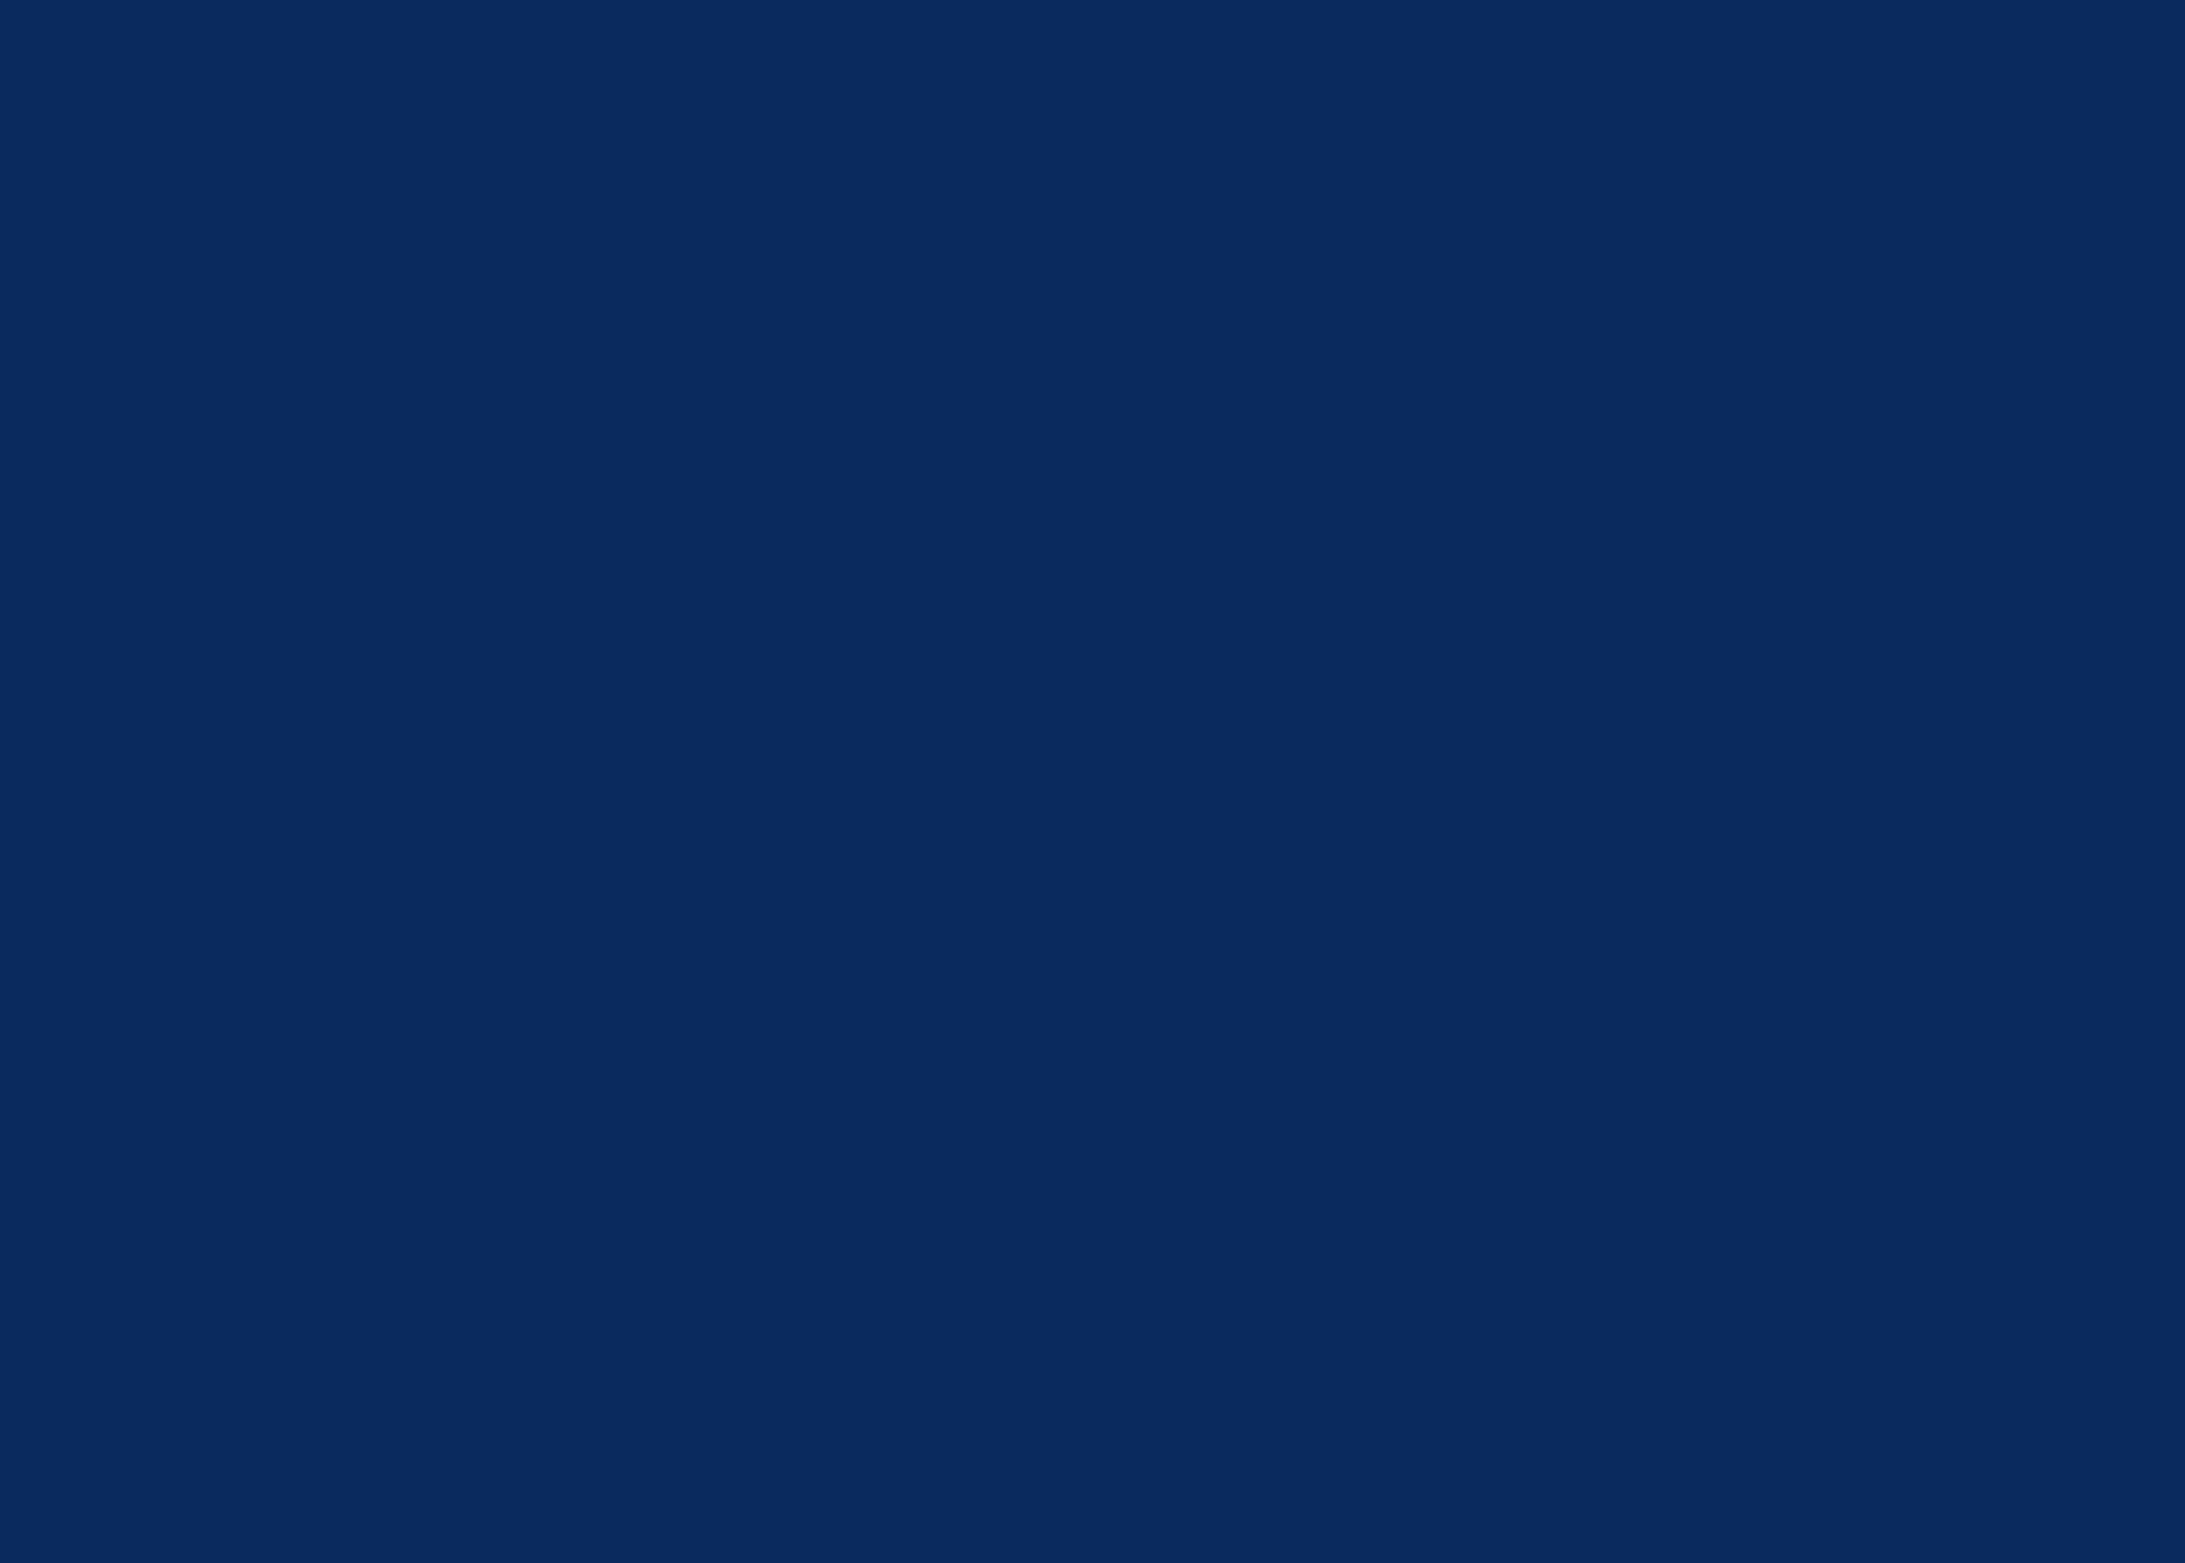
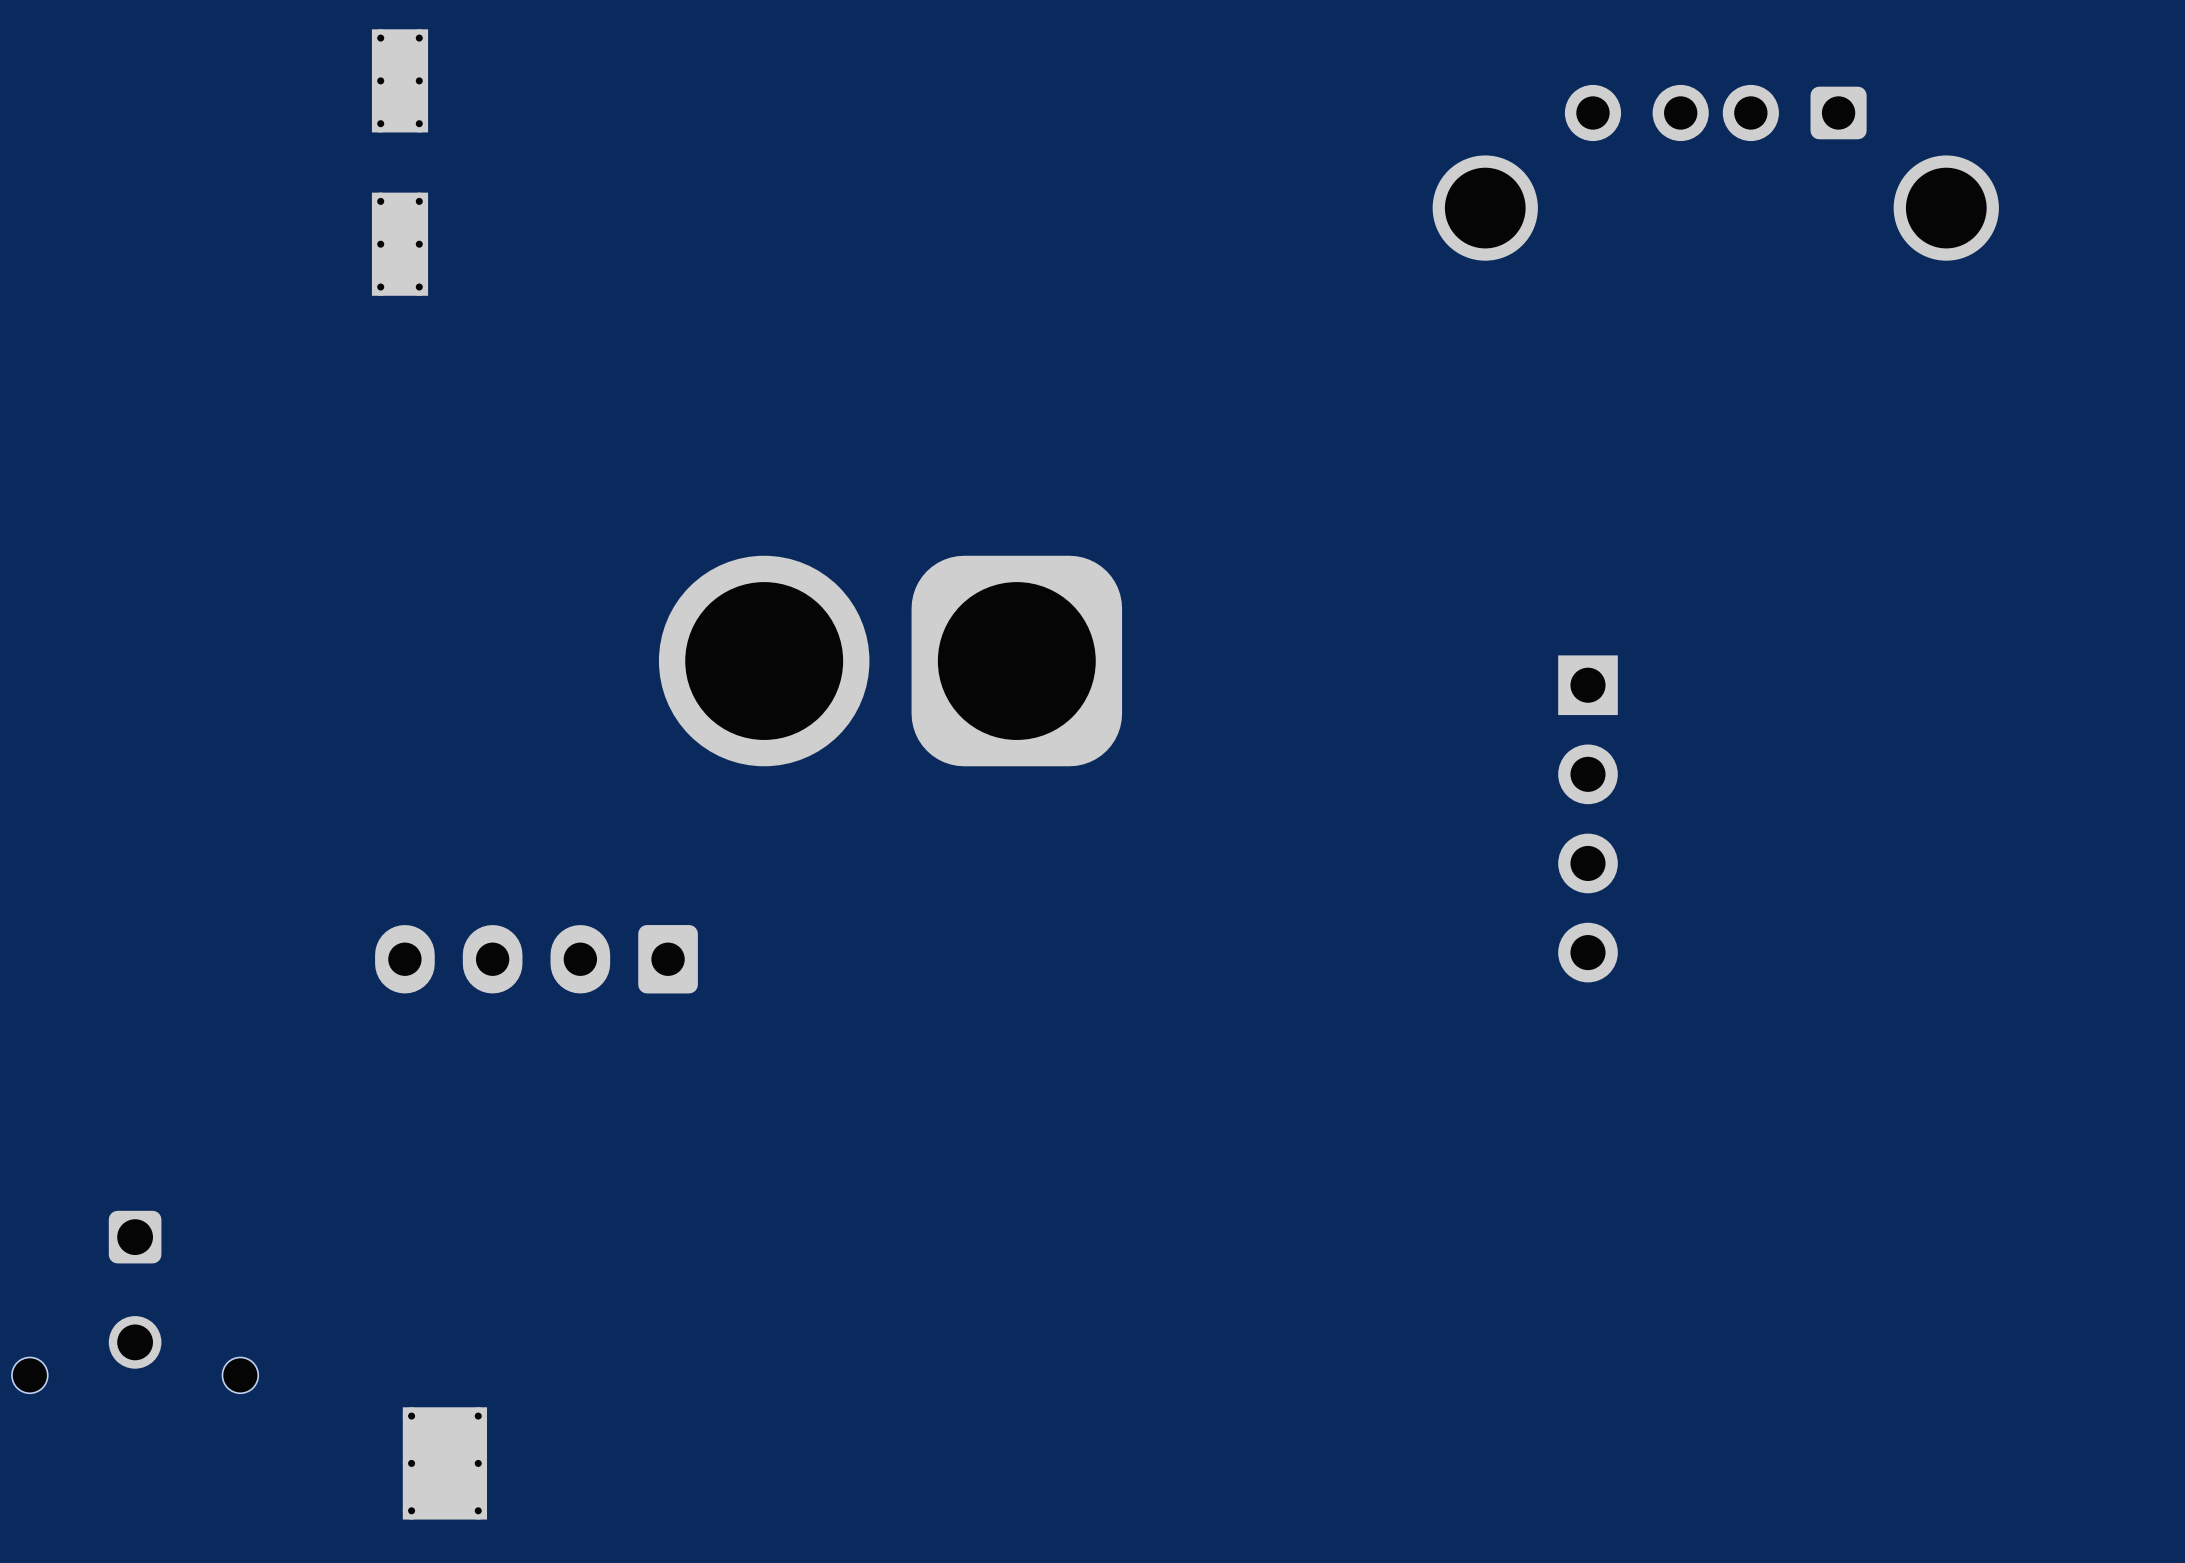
part: none -> (400, 80)
part: none -> (1715, 172)
part: none -> (400, 244)
part: none -> (890, 661)
part: none -> (1588, 818)
part: none -> (536, 959)
part: none -> (135, 1302)
part: none -> (444, 1463)

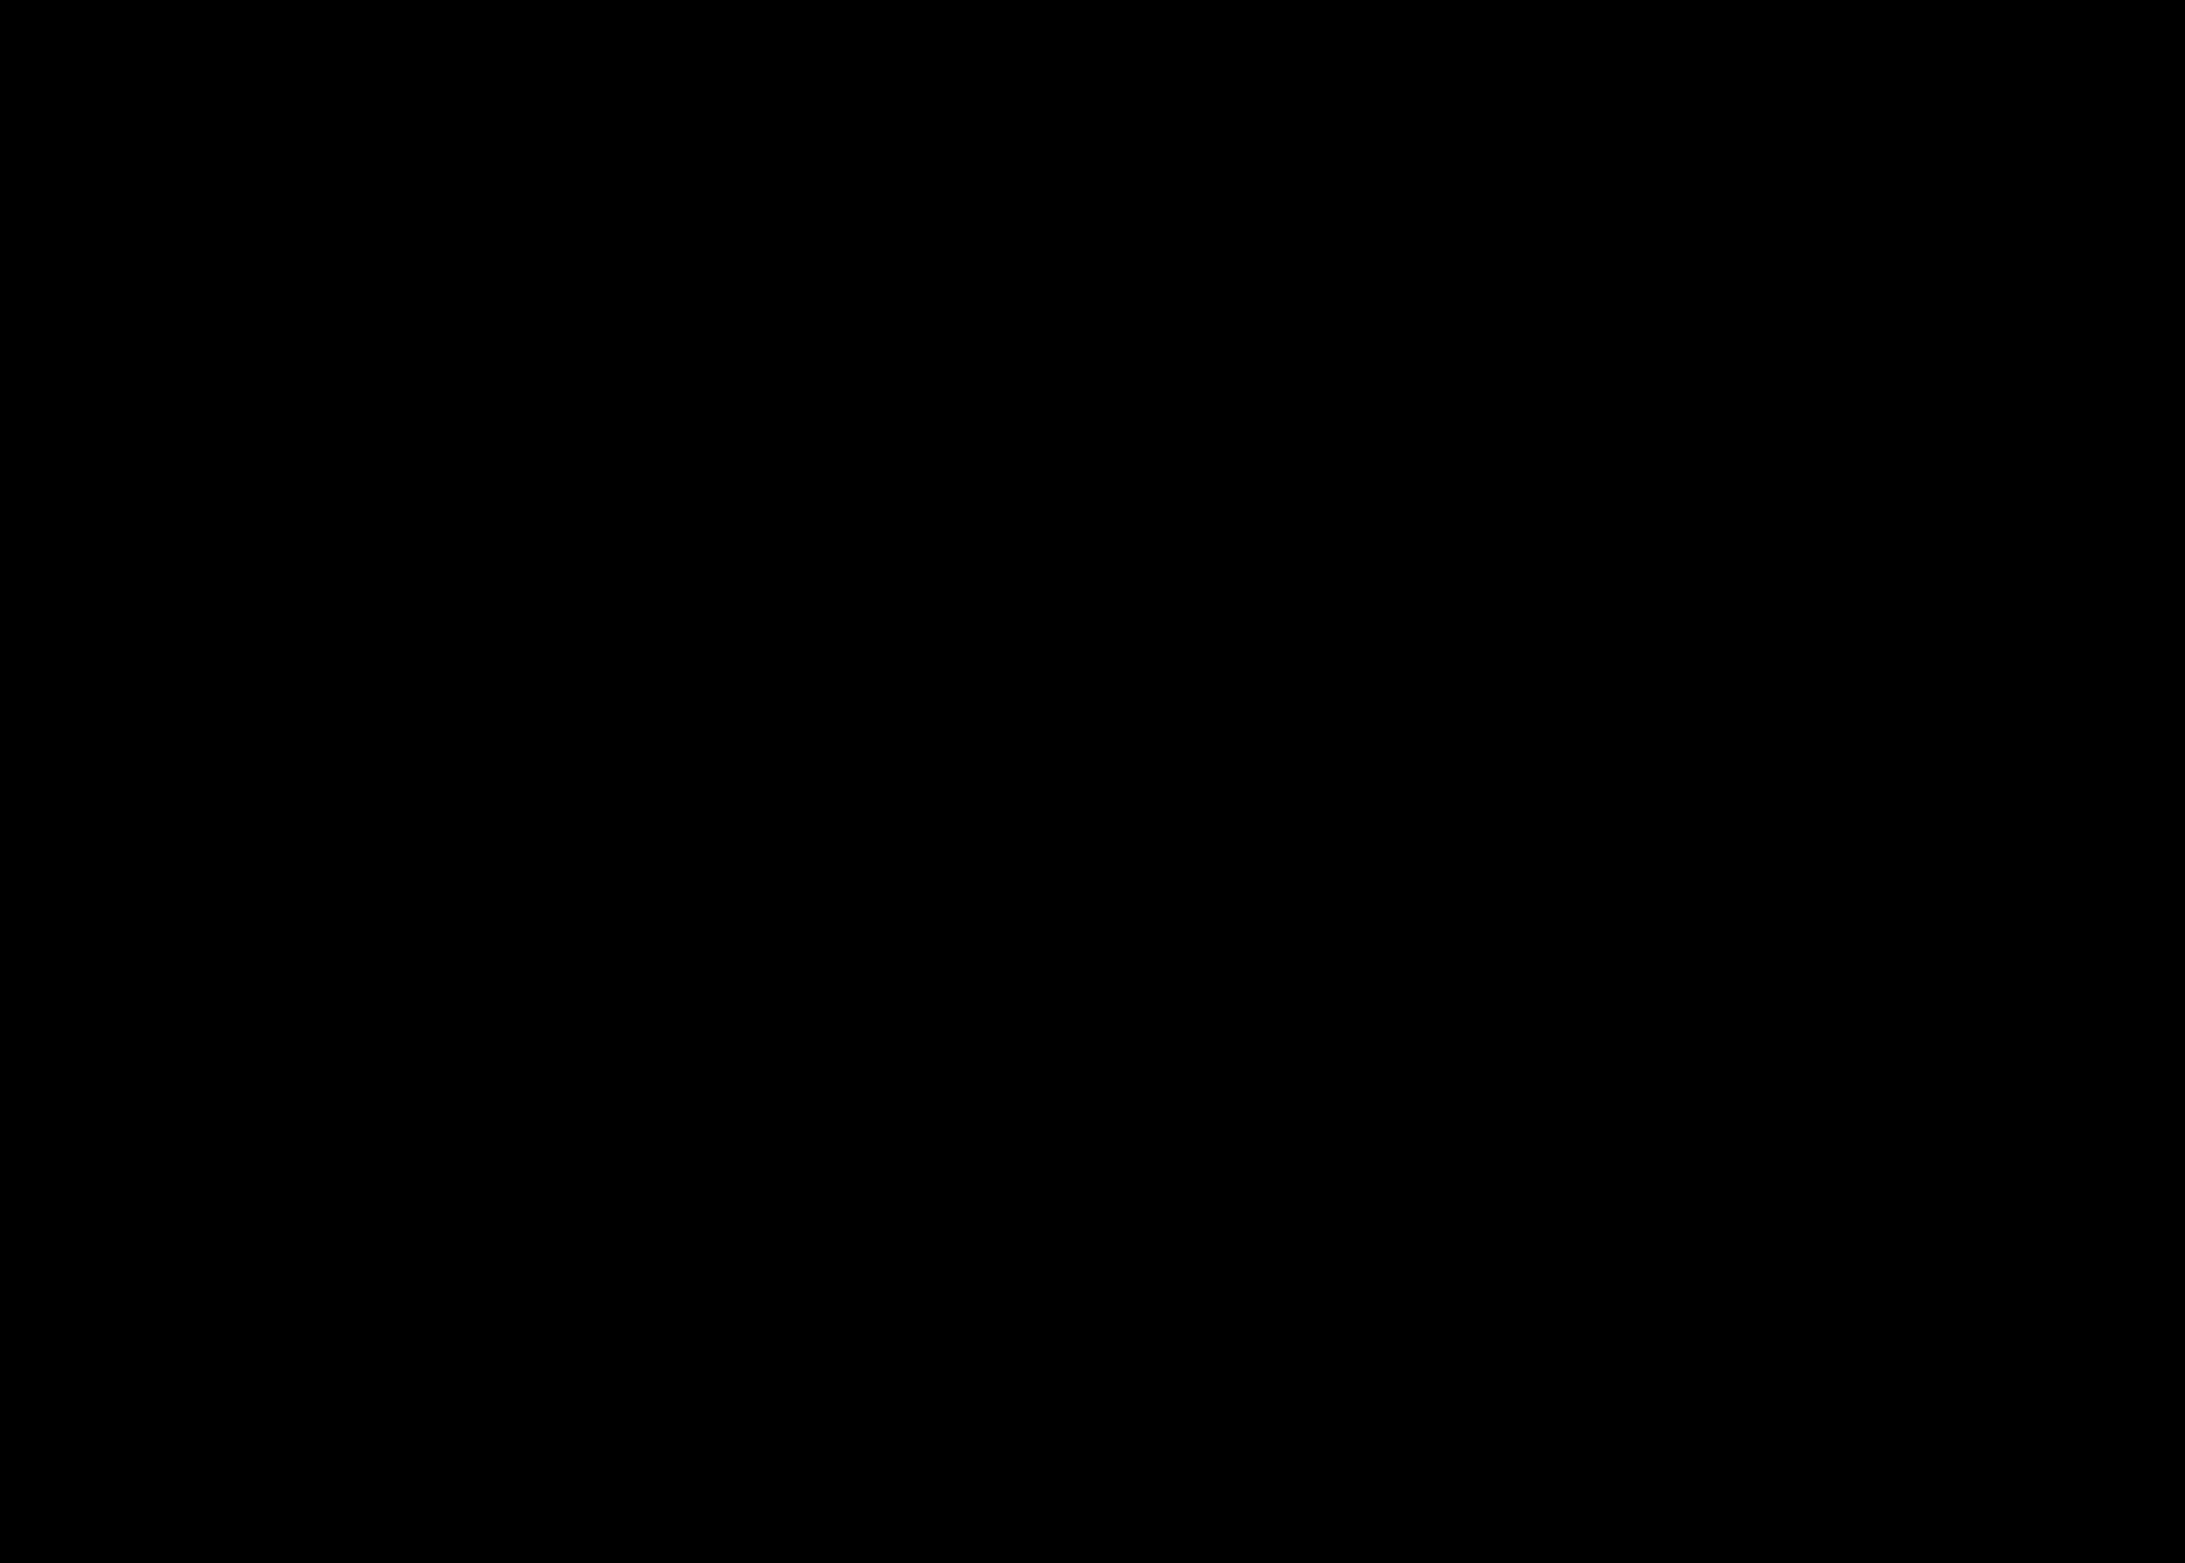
part: (400, 80) -> none
part: (1715, 172) -> none
part: (400, 244) -> none
part: (890, 661) -> none
part: (1588, 818) -> none
part: (536, 959) -> none
part: (135, 1302) -> none
part: (444, 1463) -> none

